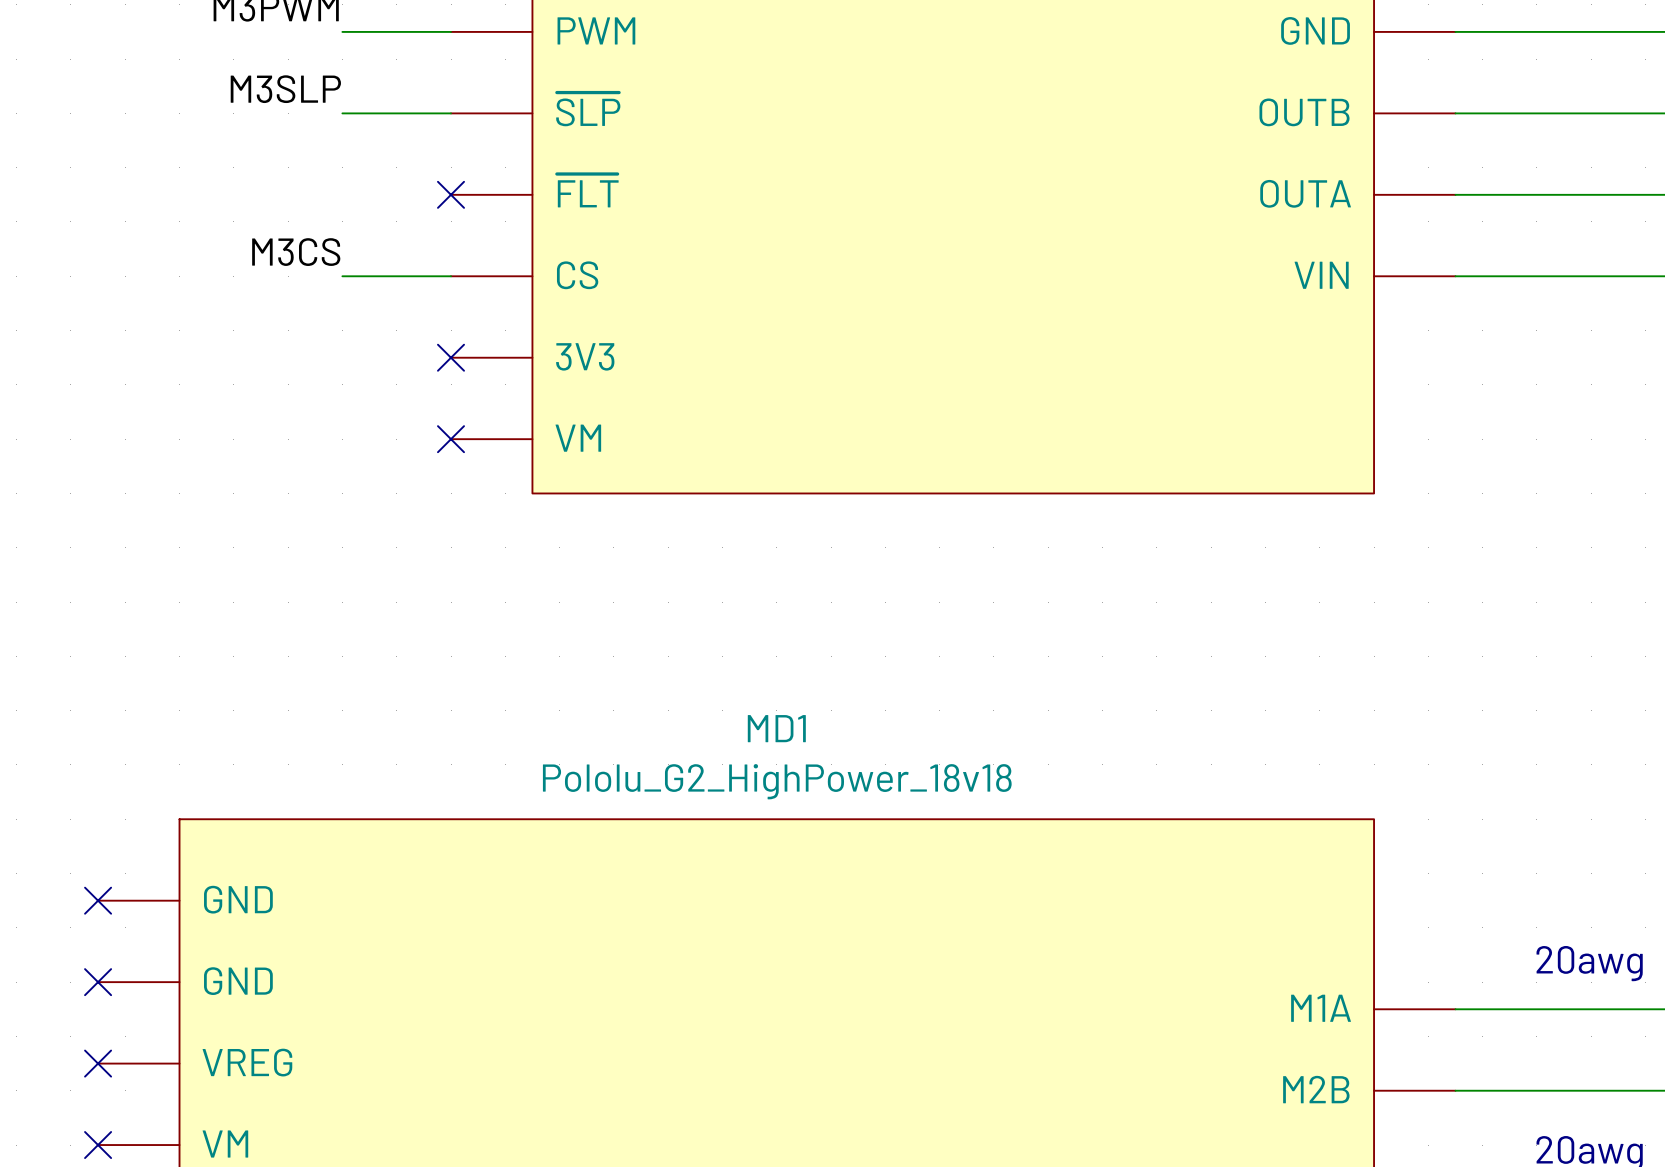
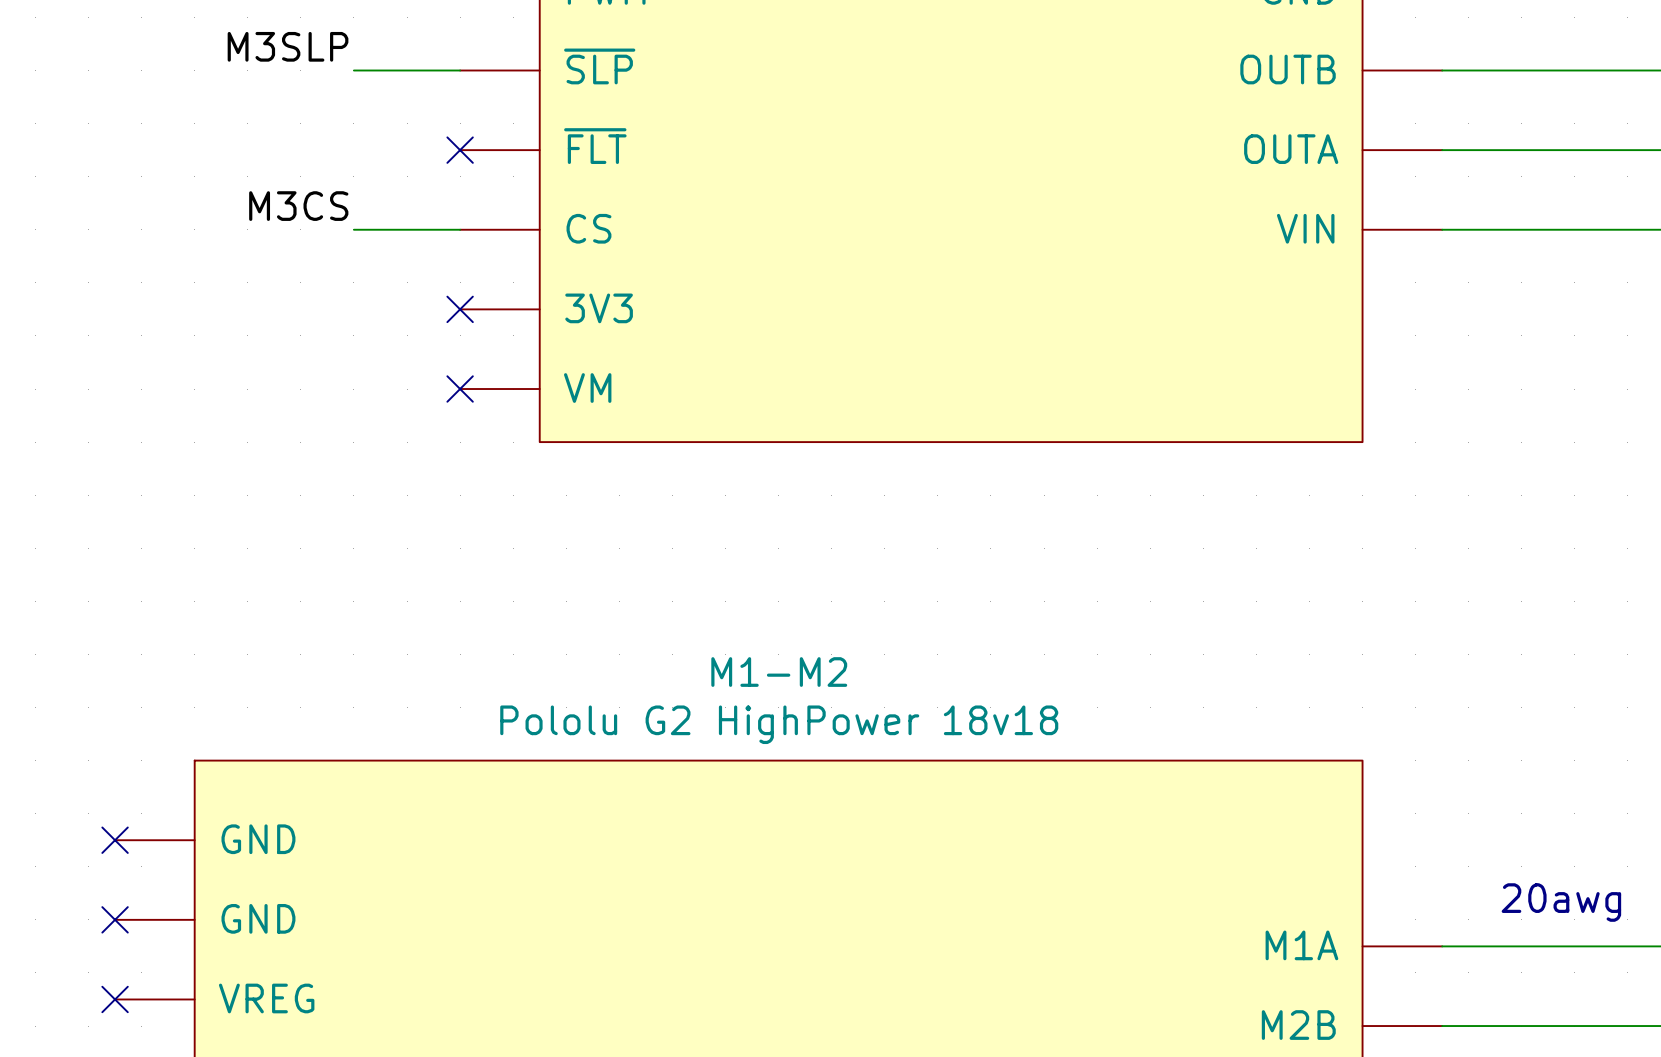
MD1 name: MD1 (776, 728) -> M1-M2 (779, 672)
MD1 value: Pololu_G2_HighPower_18v18 (777, 781) -> Pololu G2 HighPower 18v18 (779, 724)

